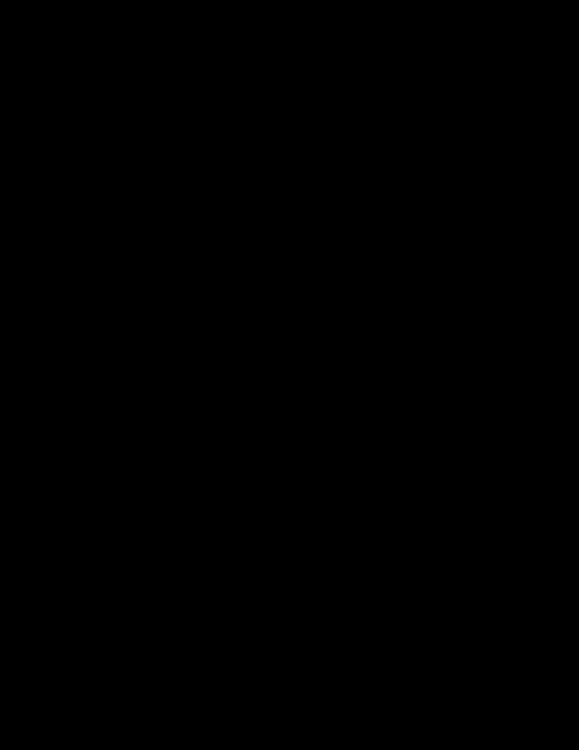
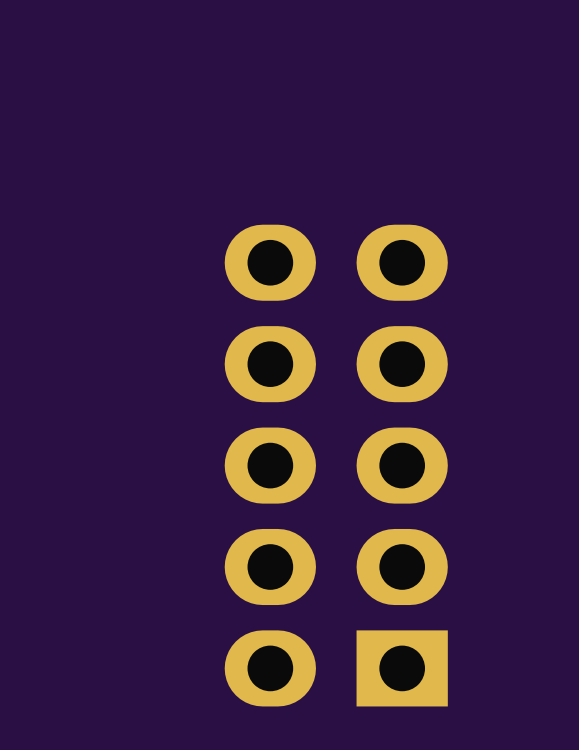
part: none -> (336, 465)

